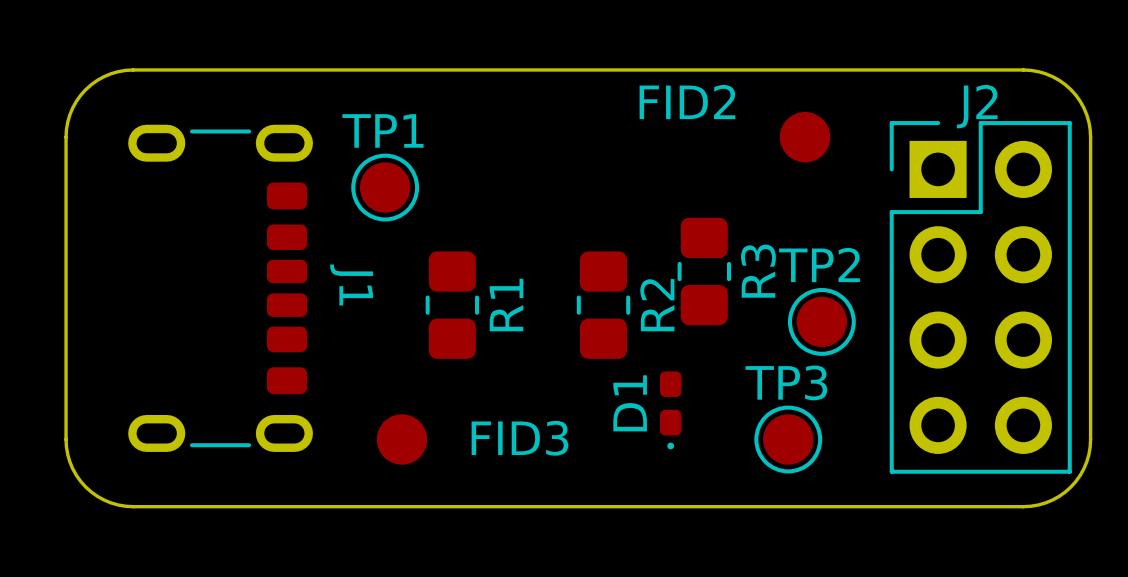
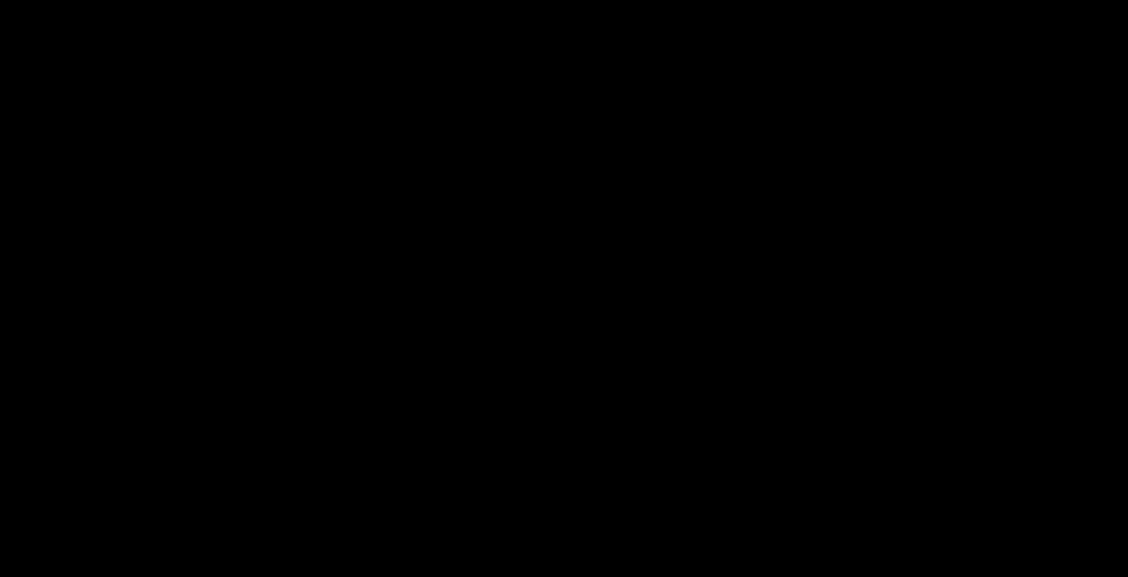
board edge: (133, 69) (1023, 69) (1038, 71) (1052, 76) (1070, 89) (1080, 101) (1086, 114) (1090, 129) (1090, 439) (1088, 454) (1083, 468) (1070, 487) (1059, 496) (1045, 502) (1023, 506) (133, 506) (118, 505) (104, 500) (85, 487) (76, 475) (69, 461) (66, 447) (66, 129) (72, 108) (85, 89) (104, 76) (118, 71) (133, 69) -> none
FID2: (805, 137) -> none
TP1: (385, 187) -> none
R3: (704, 271) -> none
J1: (220, 288) -> none
J2: (980, 297) -> none
R1: (452, 305) -> none
R2: (603, 305) -> none
TP2: (821, 321) -> none
D1: (670, 410) -> none
FID3: (401, 439) -> none
TP3: (788, 439) -> none

